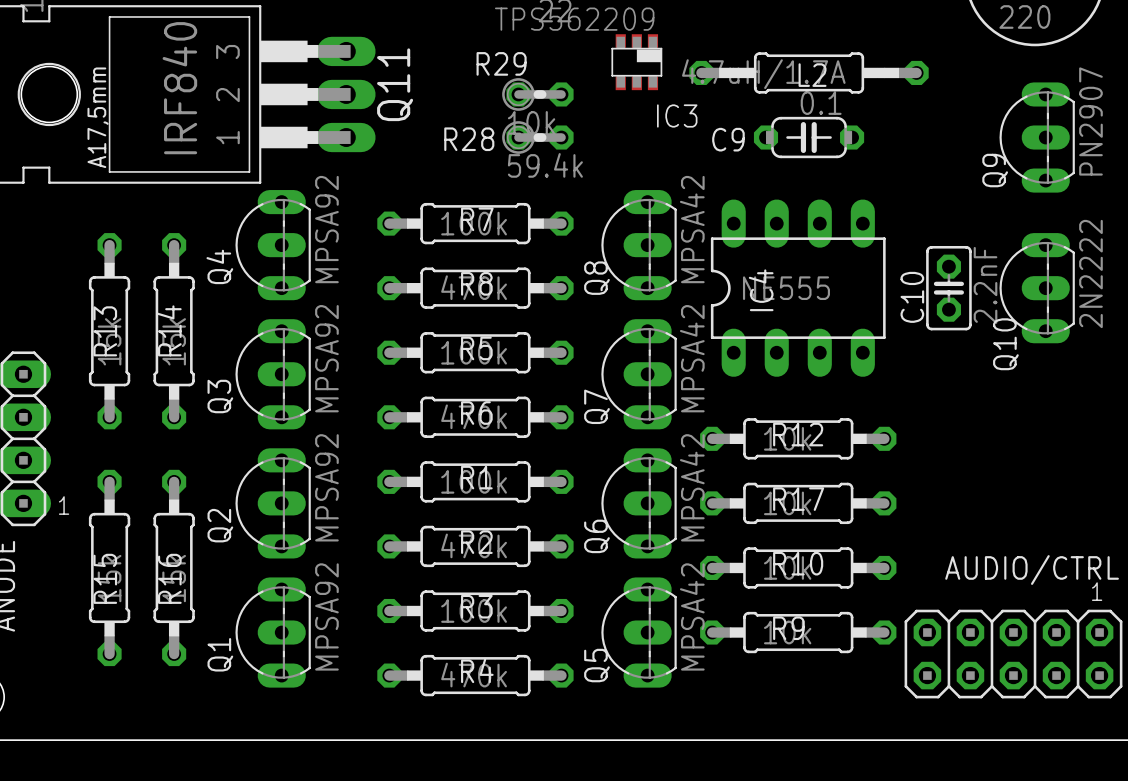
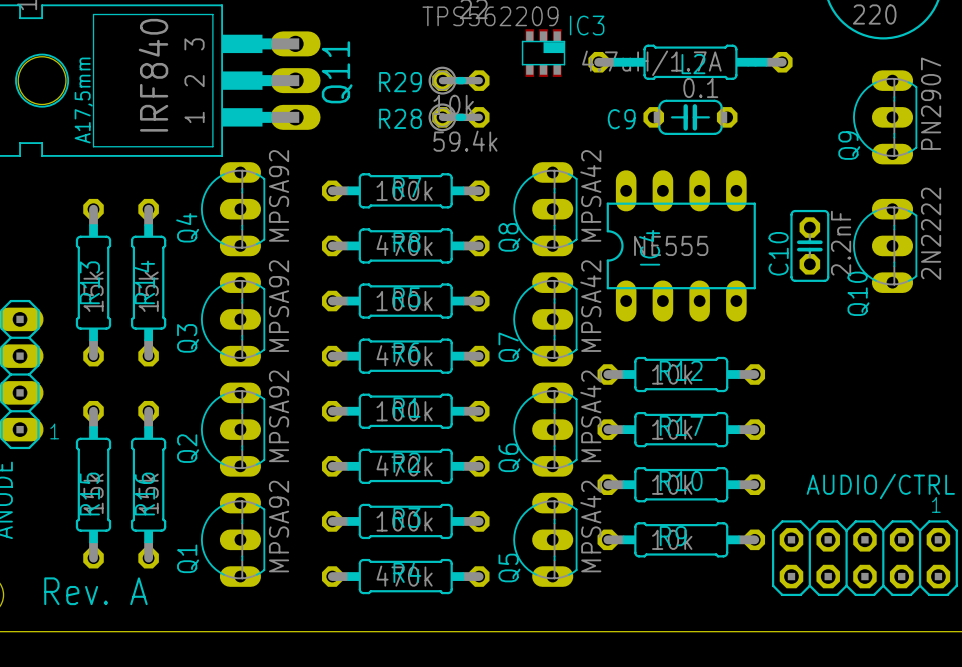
R29 name position: R29 (501, 63) -> R29 (400, 82)
IC3 name position: IC3 (677, 115) -> IC3 (587, 25)
text: none -> Rev. A (95, 591)

